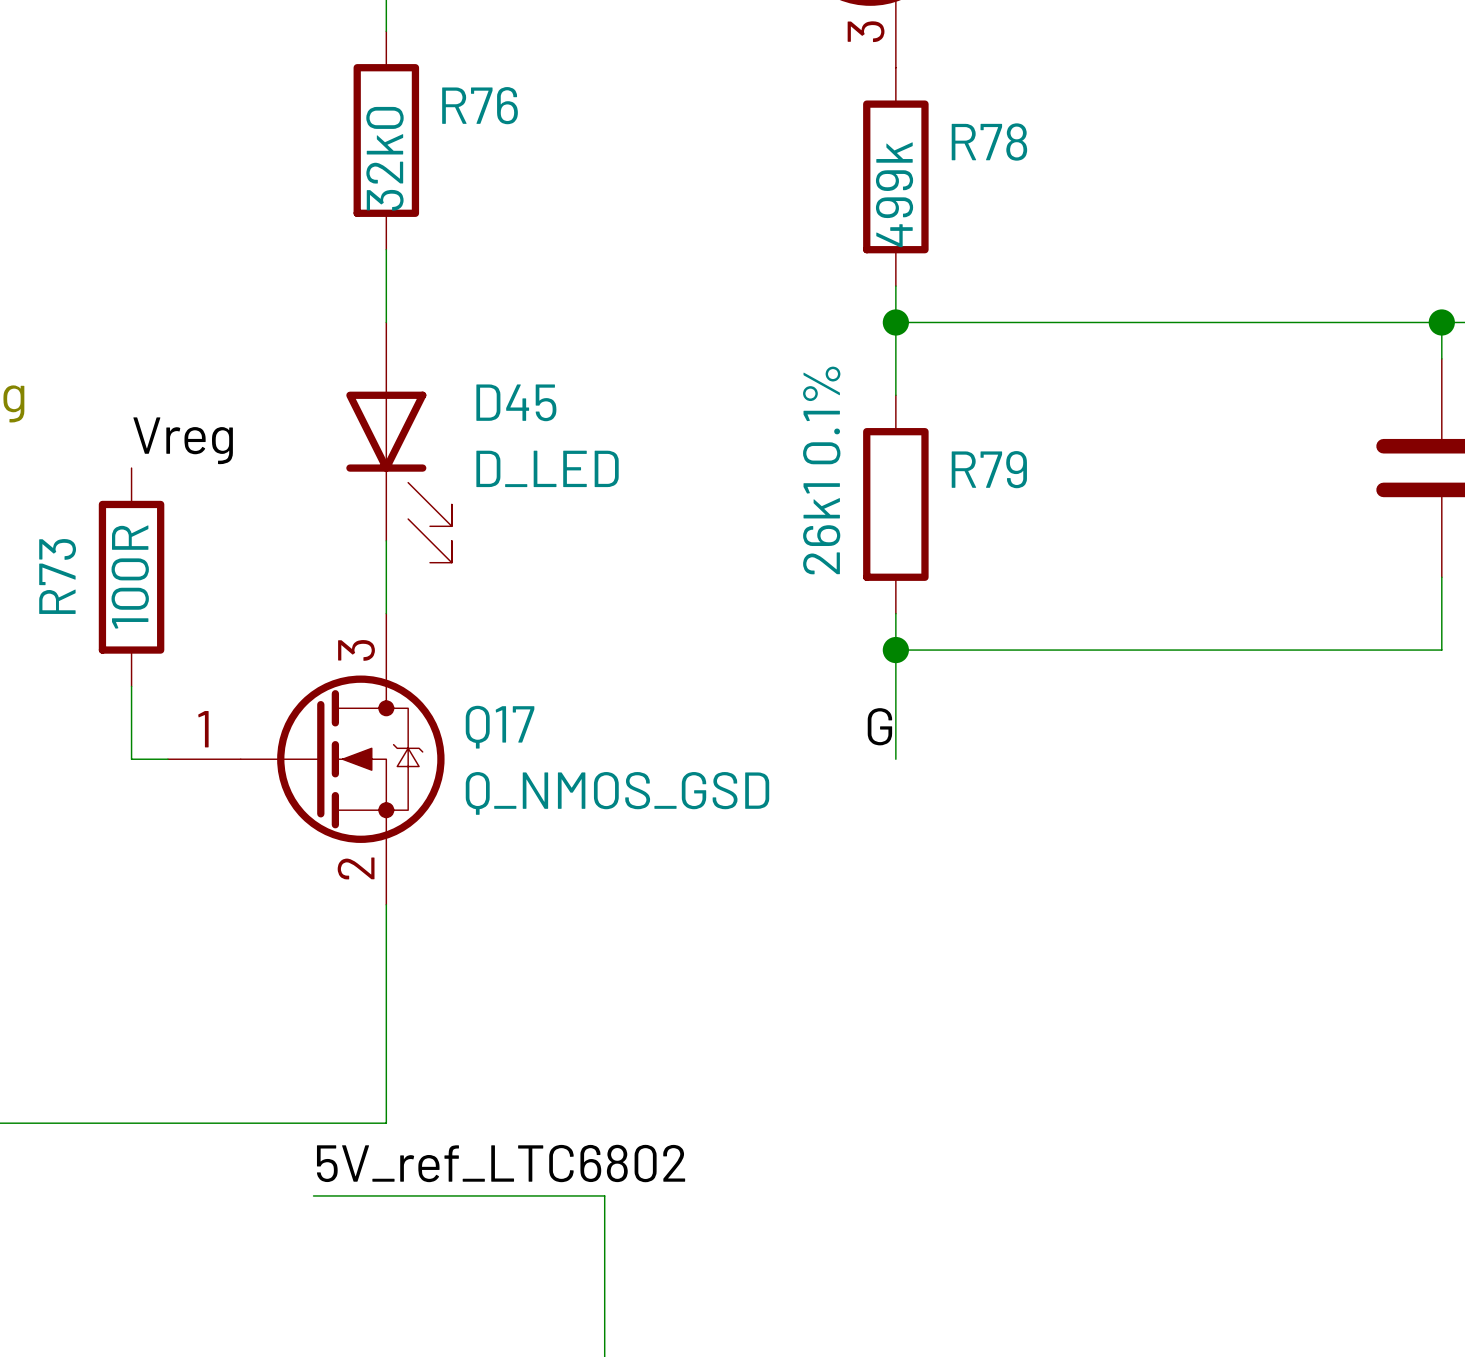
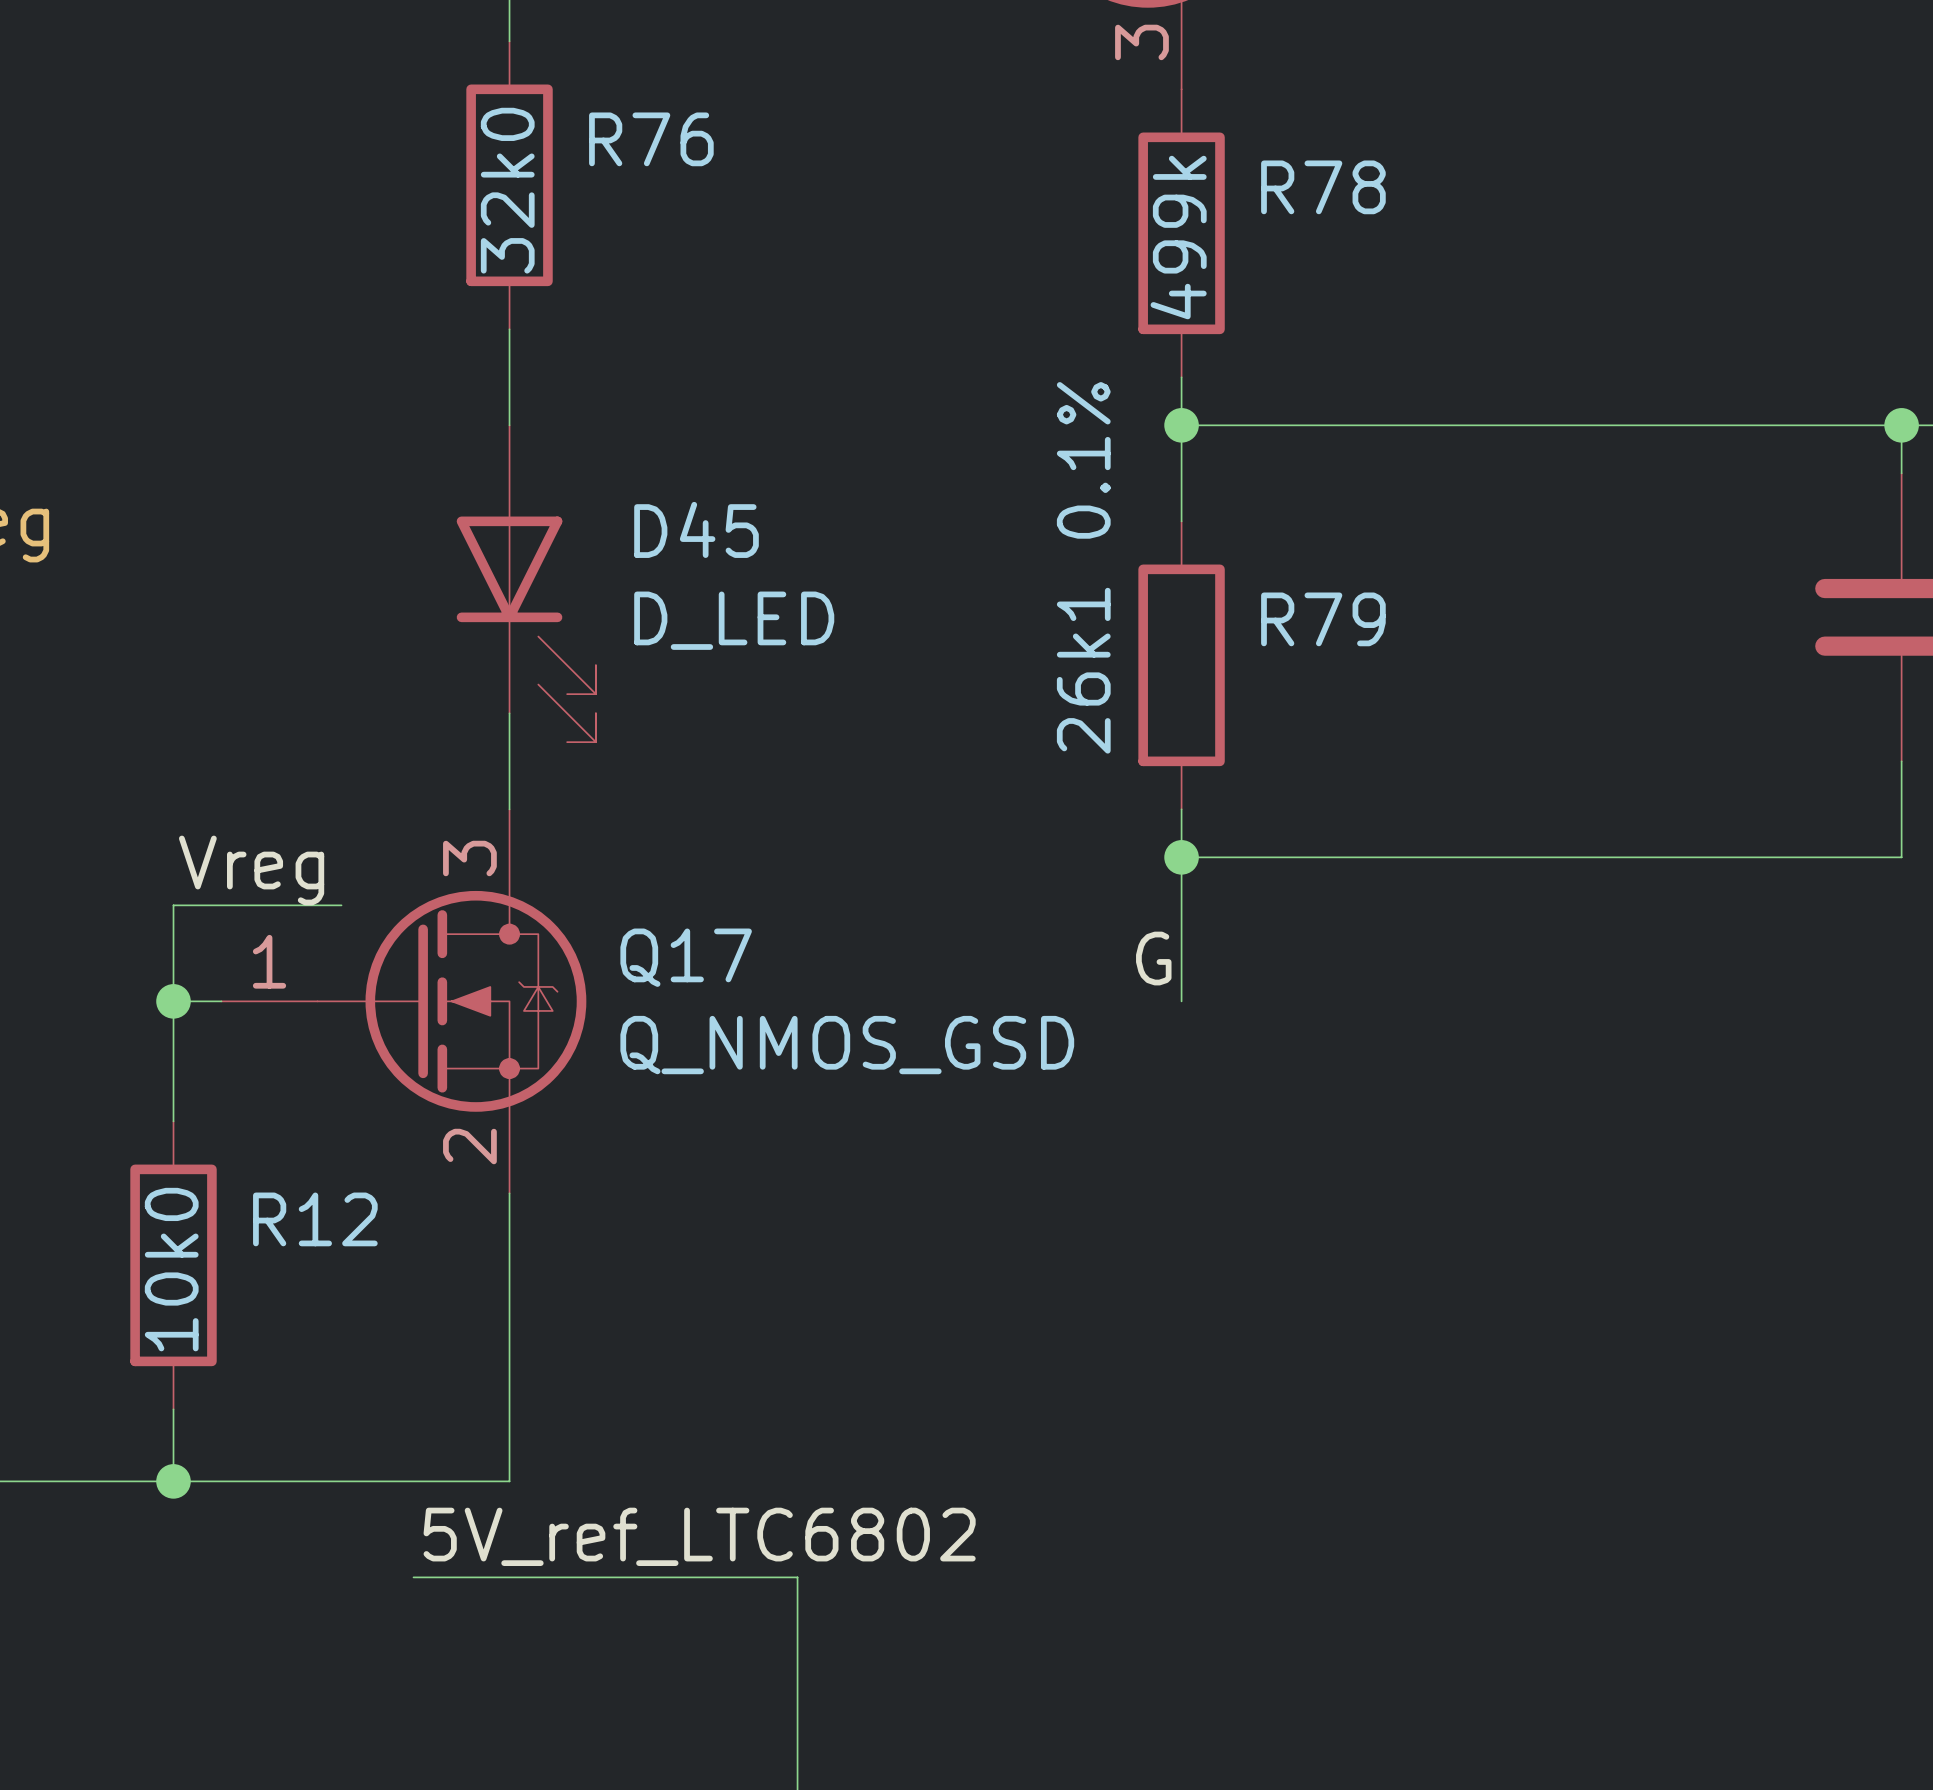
label position: Vreg (183, 440) -> Vreg (251, 870)
R73: 100R (131, 577) -> none
wire: none -> (173, 905) (341, 905)
wire: none -> (173, 1001) (173, 1121)
junction: none -> (173, 1001)
R12: none -> 10k0 (173, 1265)
wire: none -> (173, 1409) (173, 1481)
junction: none -> (173, 1481)

